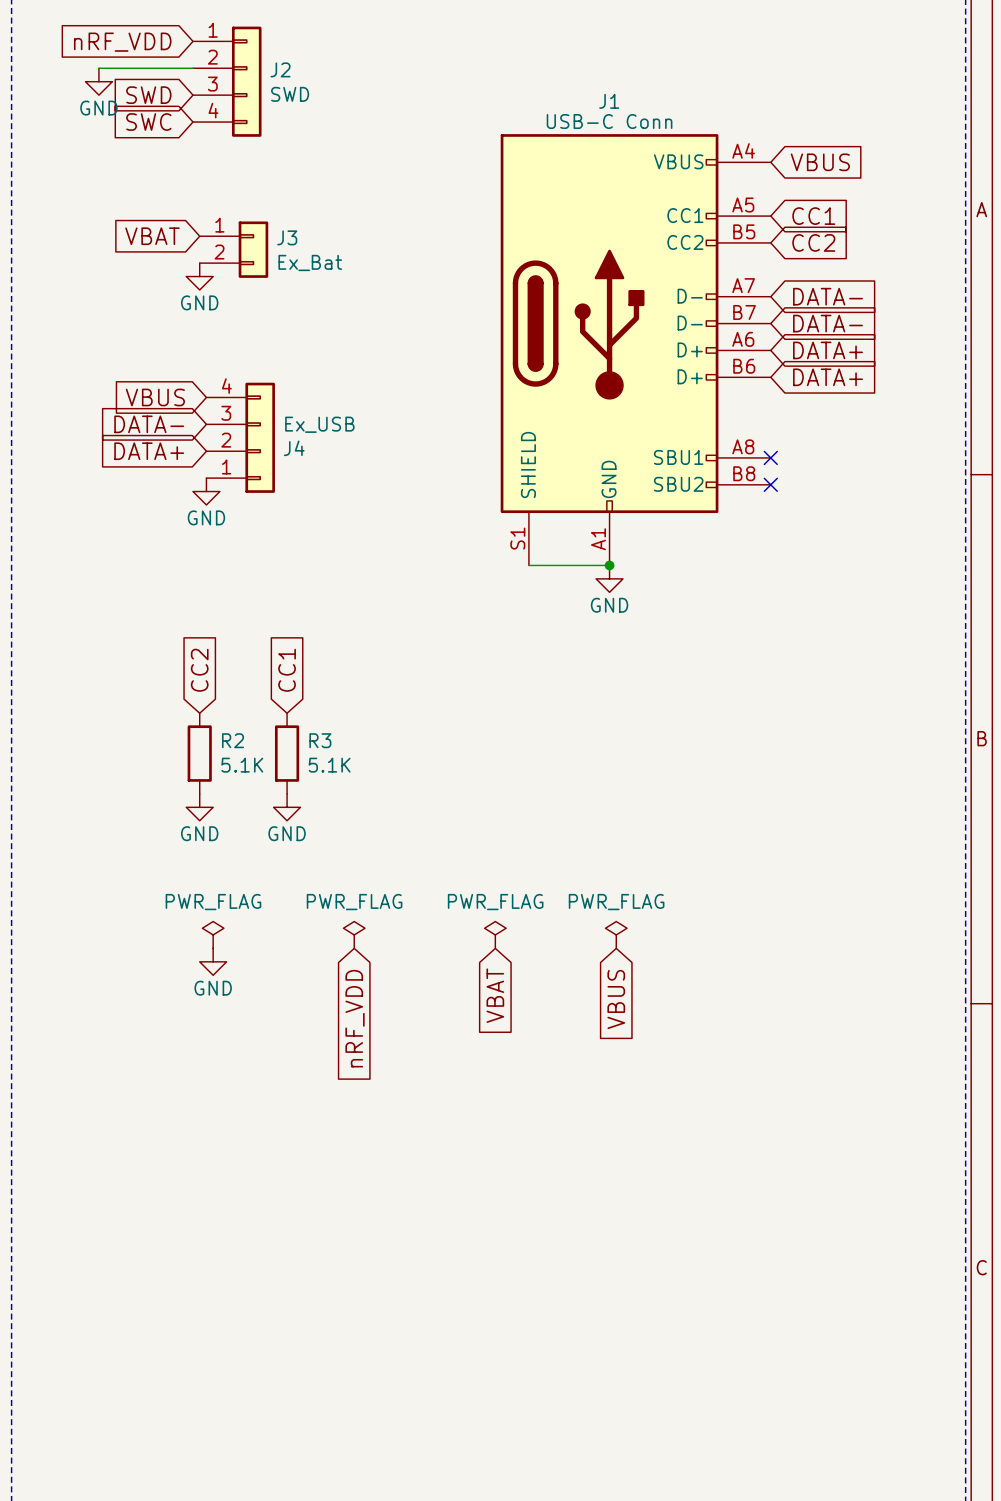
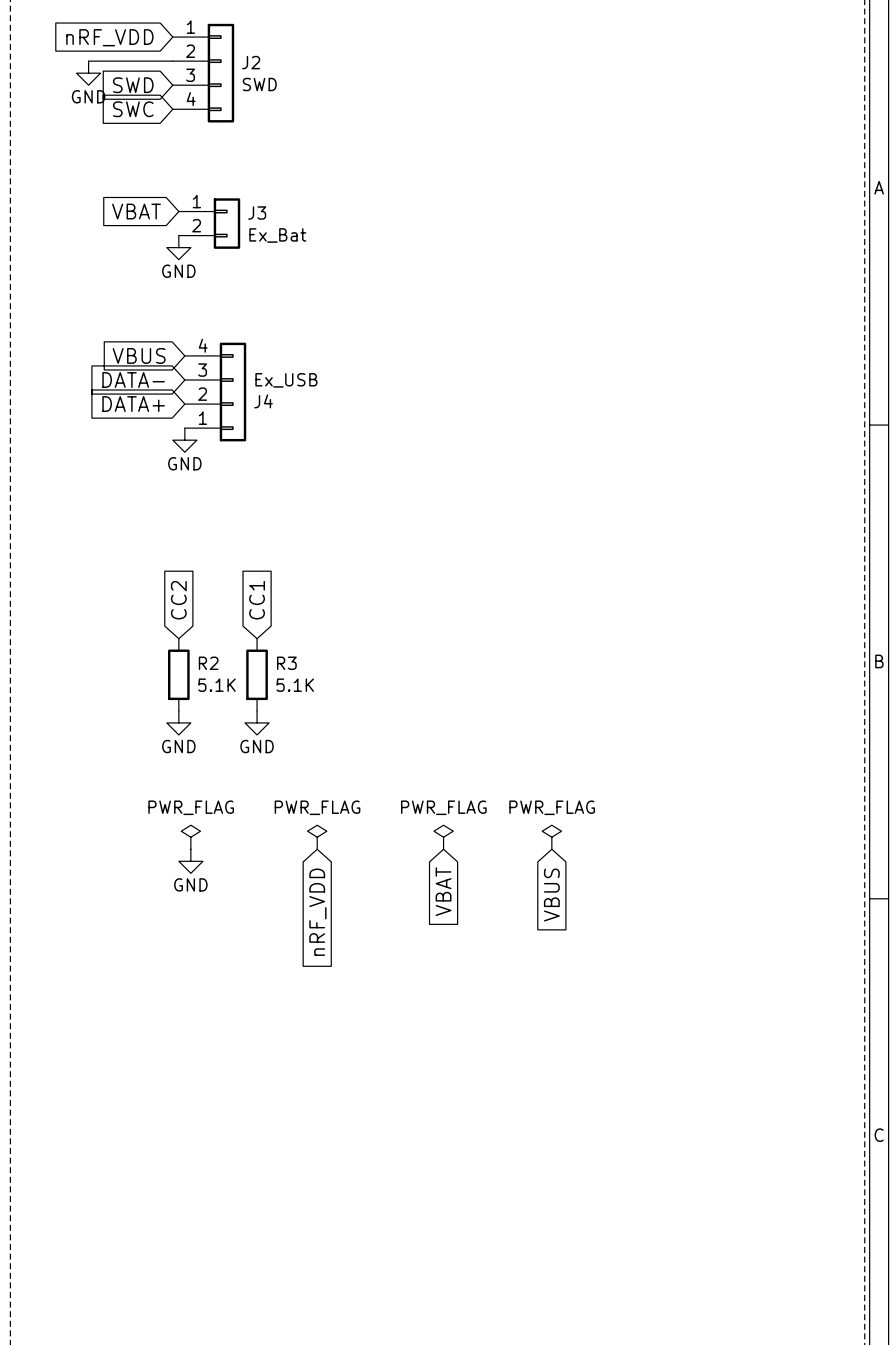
global label: VBUS (820, 162) -> none
global label: CC1 (813, 216) -> none
global label: CC2 (813, 242) -> none
global label: DATA- (828, 296) -> none
global label: DATA- (828, 323) -> none
J1: USB-C Conn (635, 349) -> none
global label: DATA+ (828, 350) -> none
global label: DATA+ (828, 377) -> none
no-connect mark: (770, 457) -> none
no-connect mark: (770, 484) -> none
wire: (528, 565) (609, 565) -> none
junction: (609, 565) -> none
power symbol: GND (609, 578) -> none

